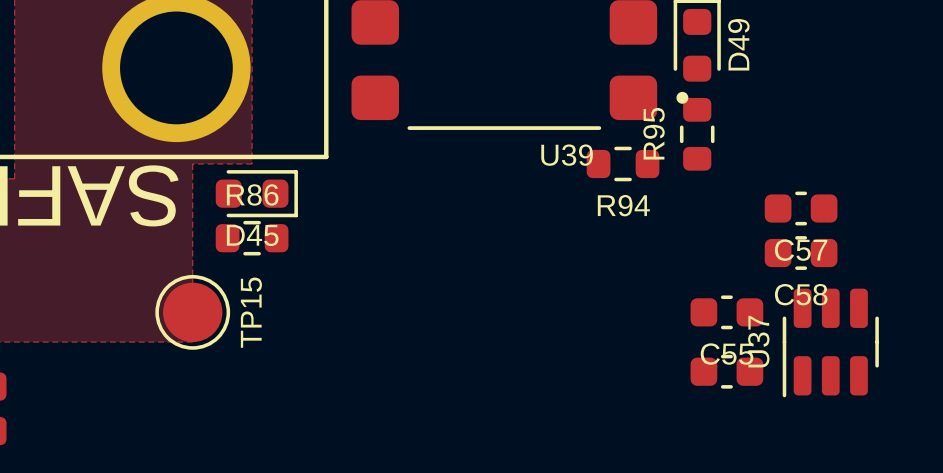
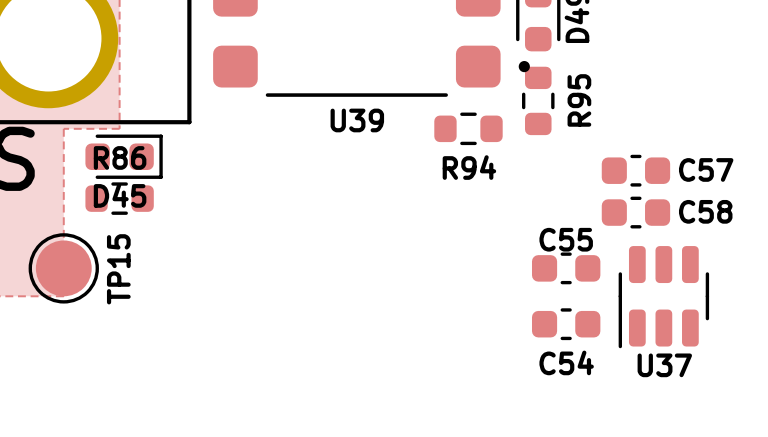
R95 name position: R95 (654, 133) -> R95 (579, 100)
U39 name position: U39 (567, 155) -> U39 (357, 120)
C57 name position: C57 (801, 250) -> C57 (706, 169)
C58 name position: C58 (801, 294) -> C58 (705, 211)
U37 name rotation: 0° (758, 341) -> 90° clockwise (664, 365)
U37 name position: U37 (758, 341) -> U37 (664, 365)
C55 name position: C55 (727, 354) -> C55 (566, 239)
C54 name: none -> C54 (566, 362)

